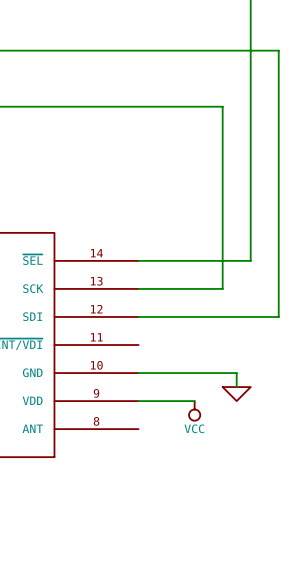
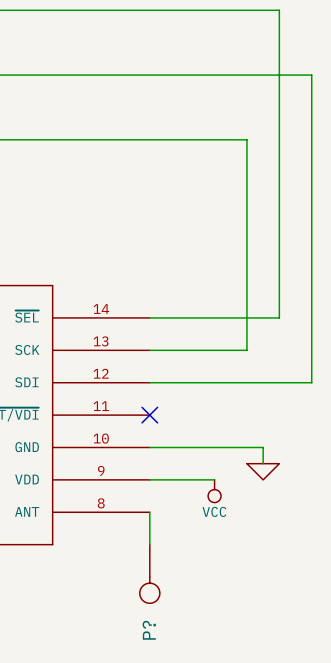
no-connect mark: none -> (149, 415)
wire: none -> (149, 512) (149, 544)
P?: none -> (149, 573)

